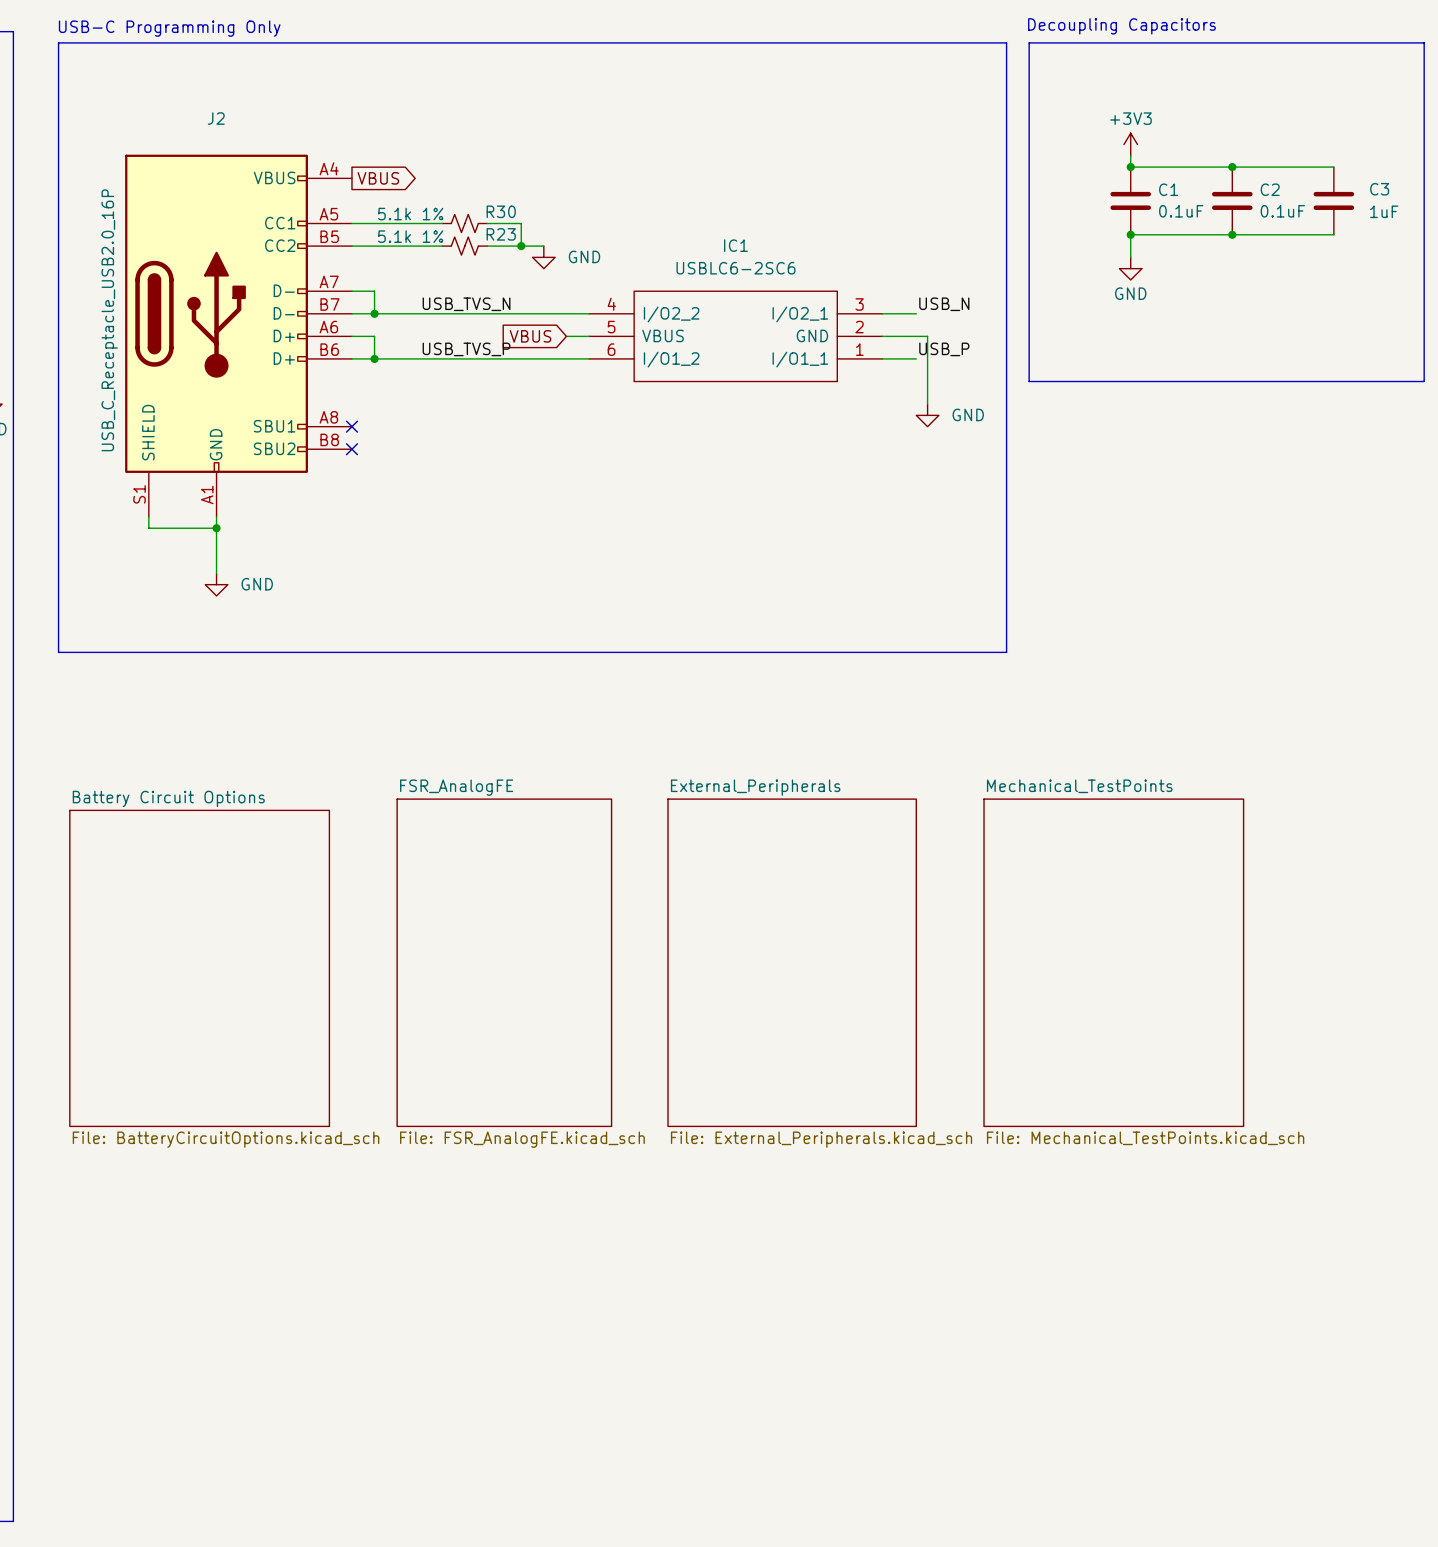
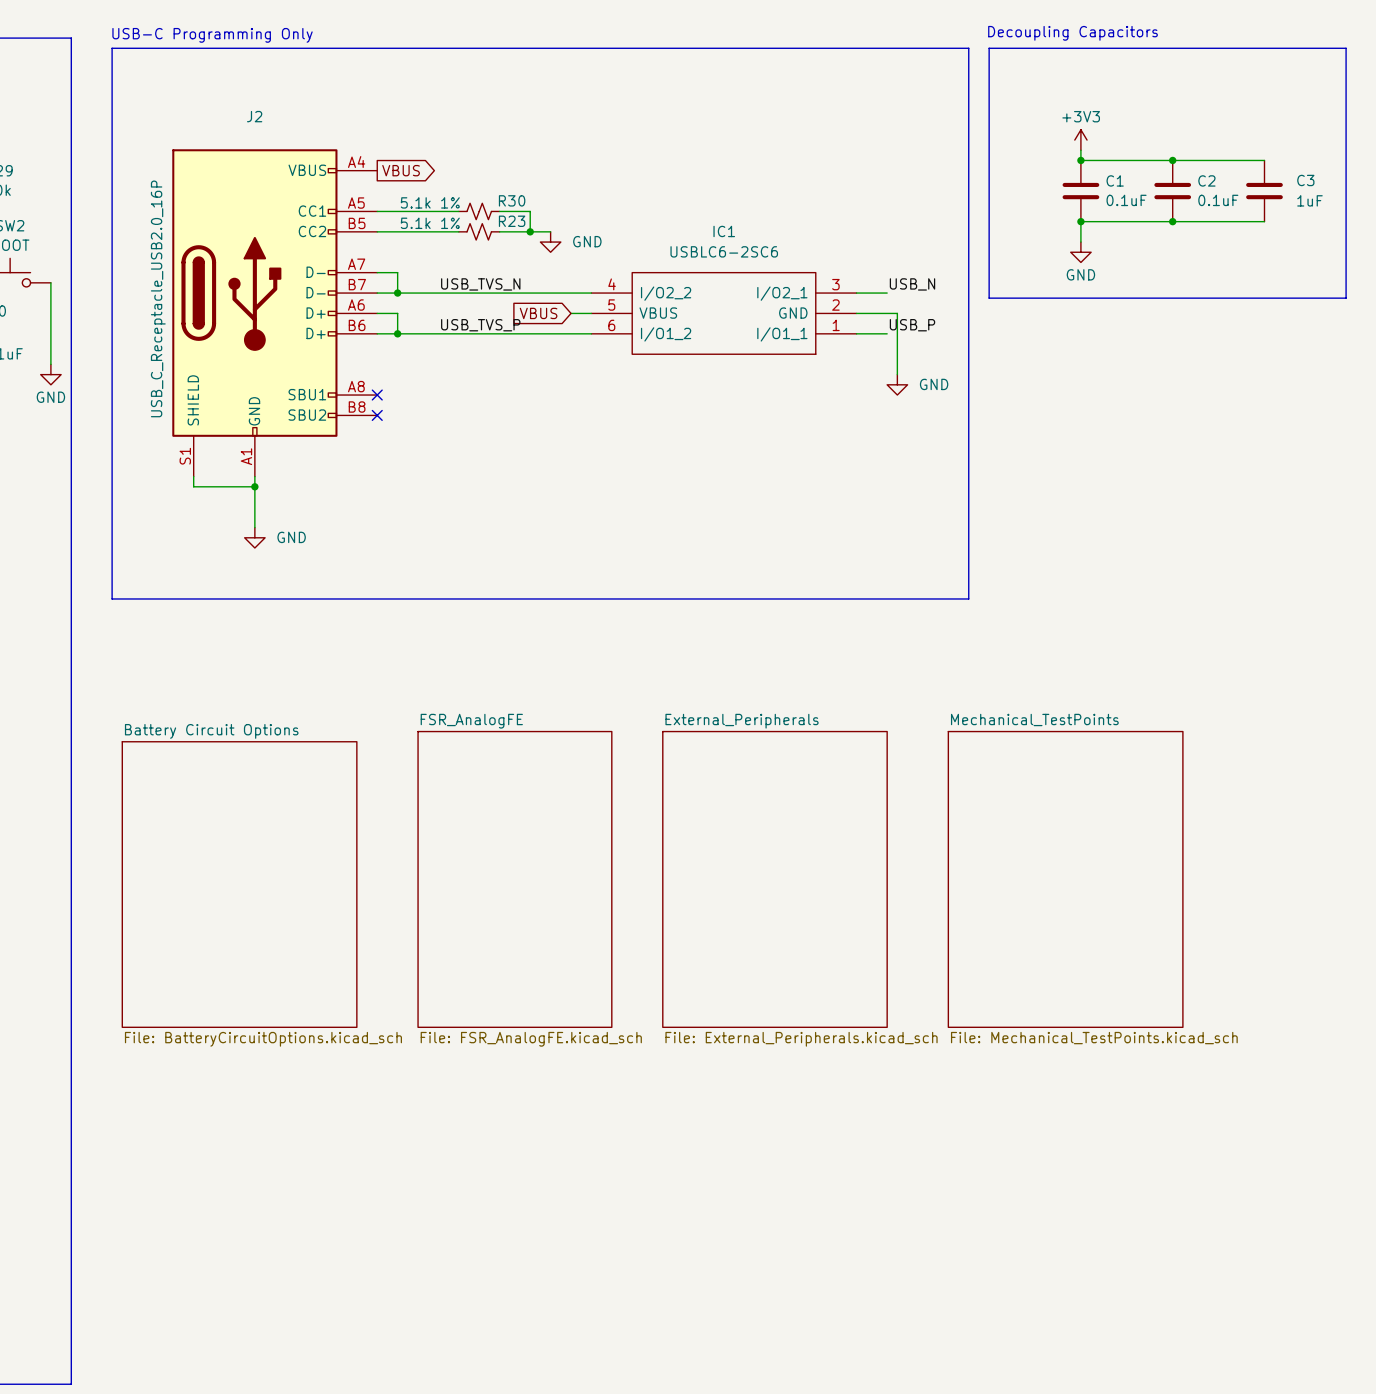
line: (1029, 319) (1029, 381) (1424, 381) (1424, 319) -> (989, 298) (1346, 298)

